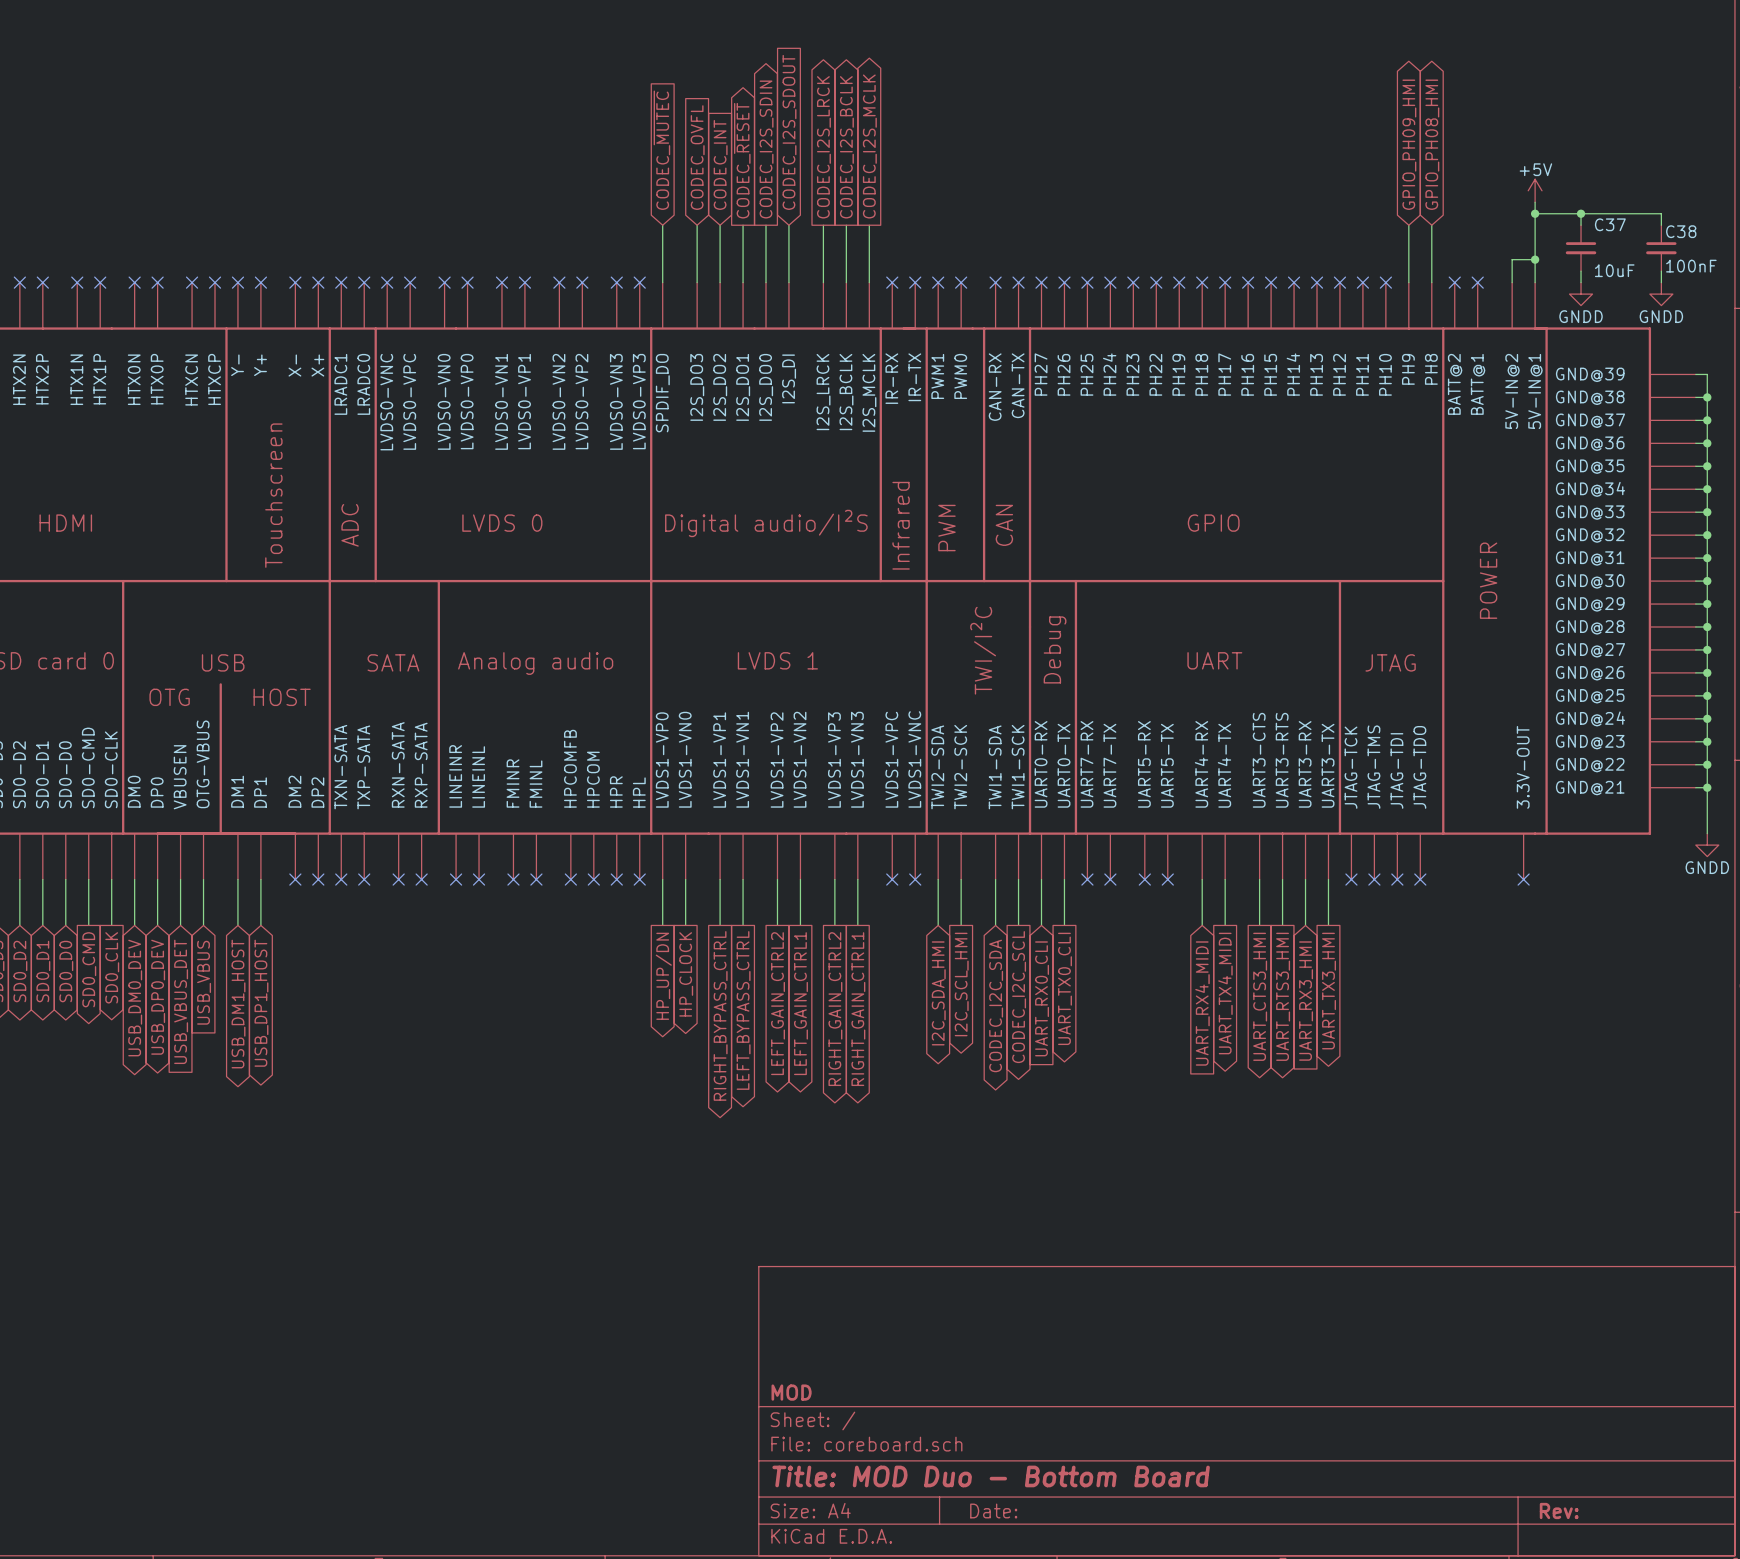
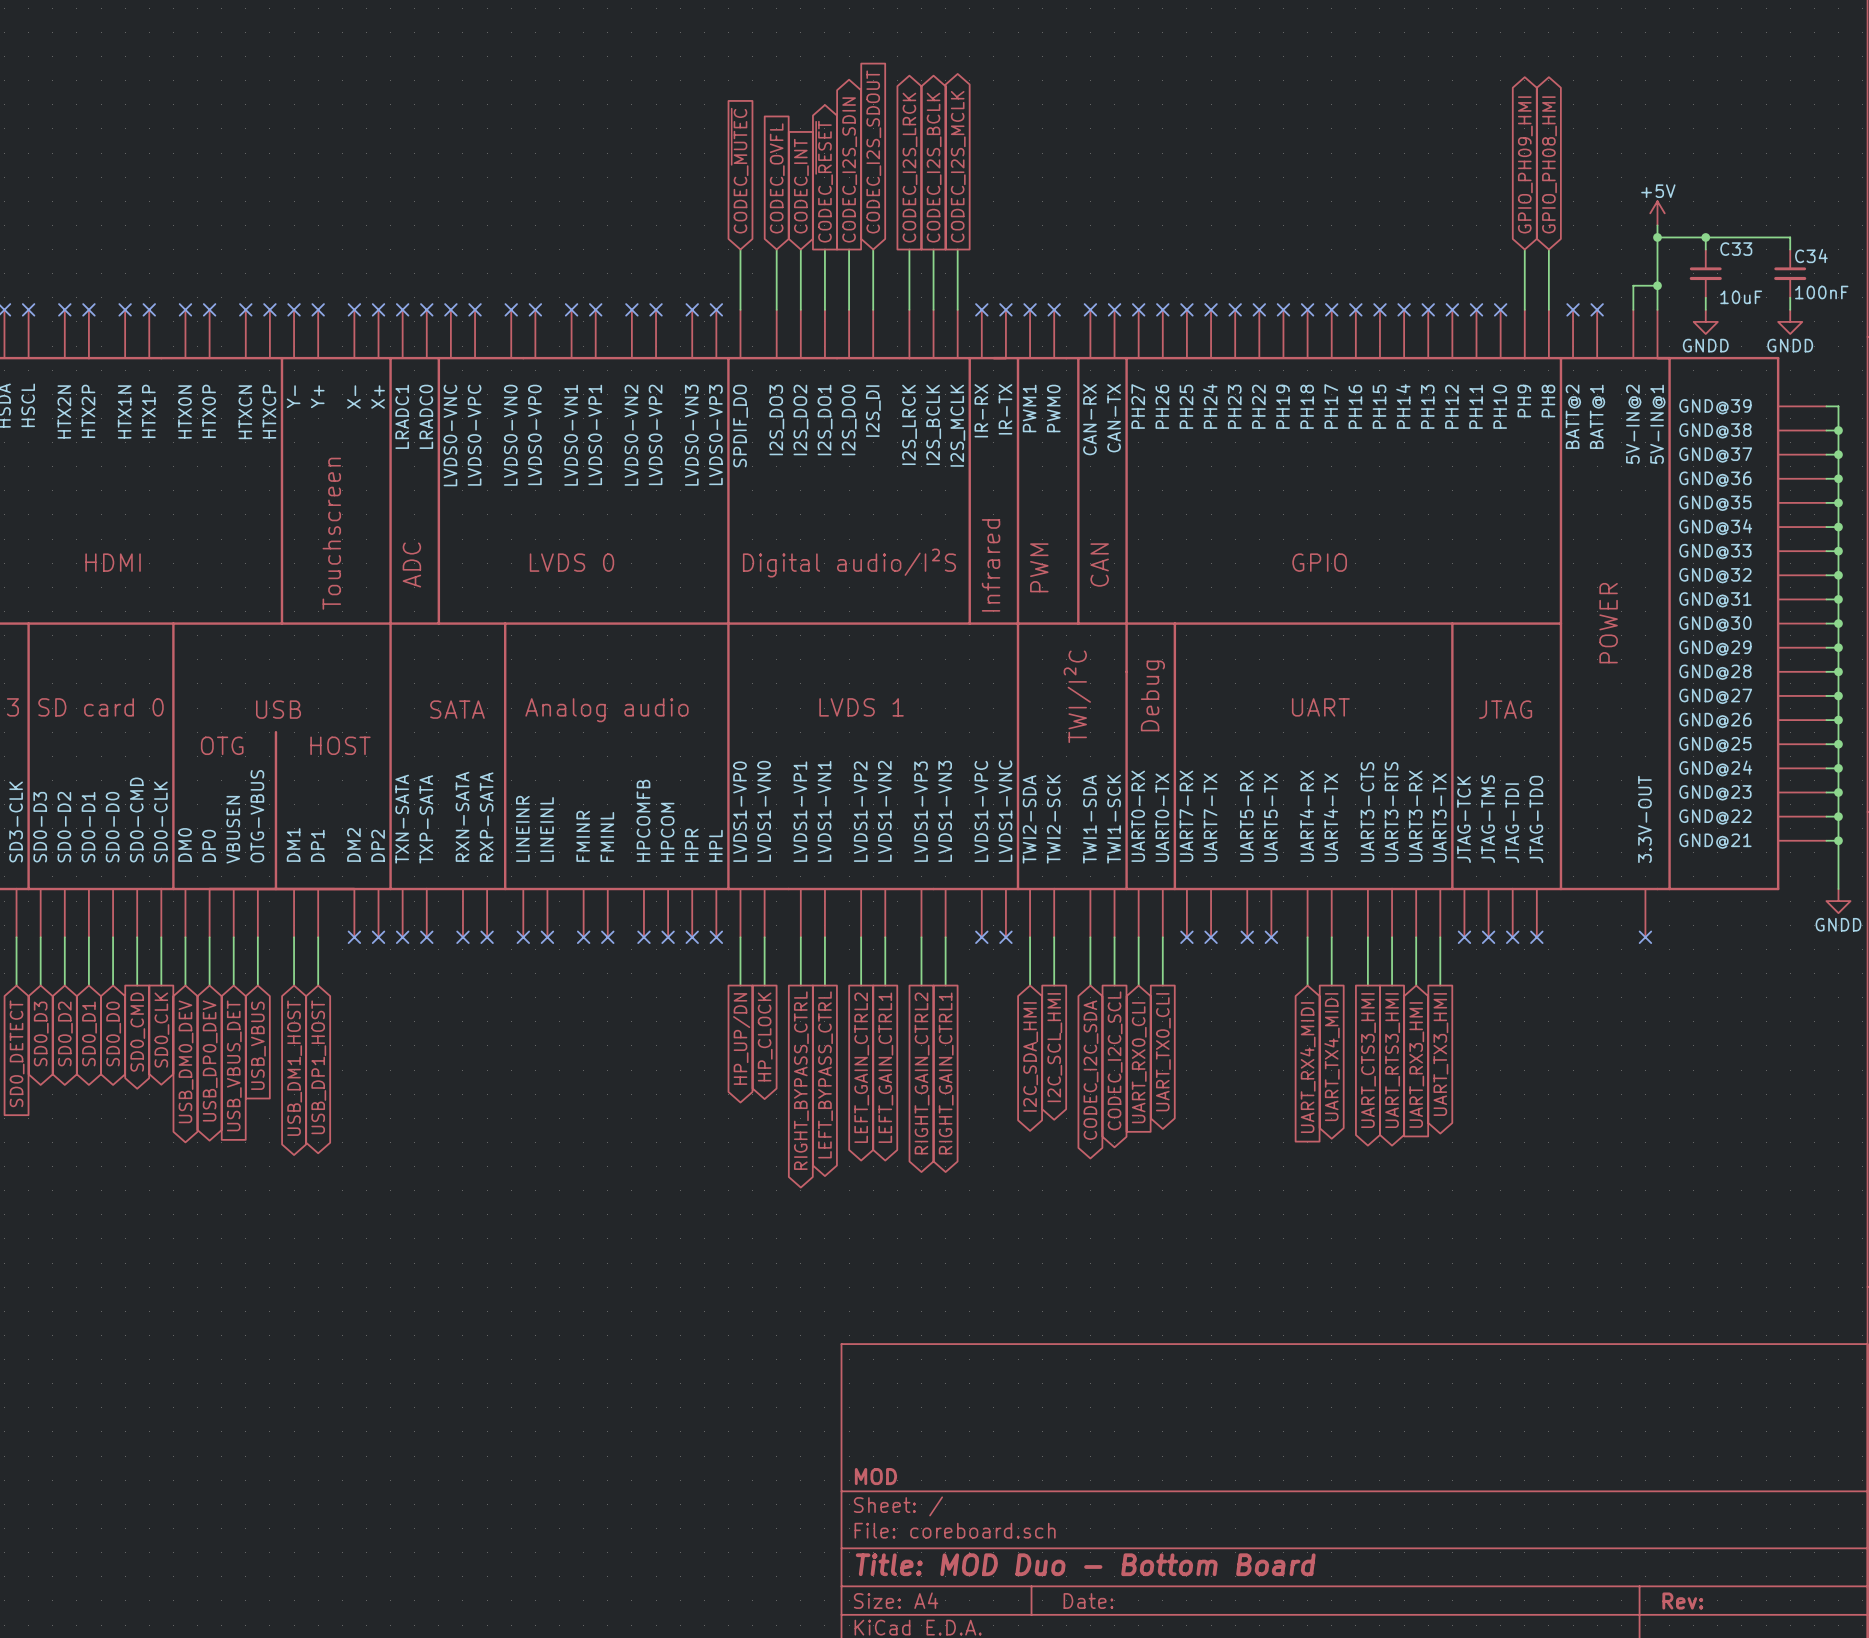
C37 name: C37 (1610, 224) -> C33 (1736, 249)
C38 name: C38 (1681, 231) -> C34 (1811, 256)

